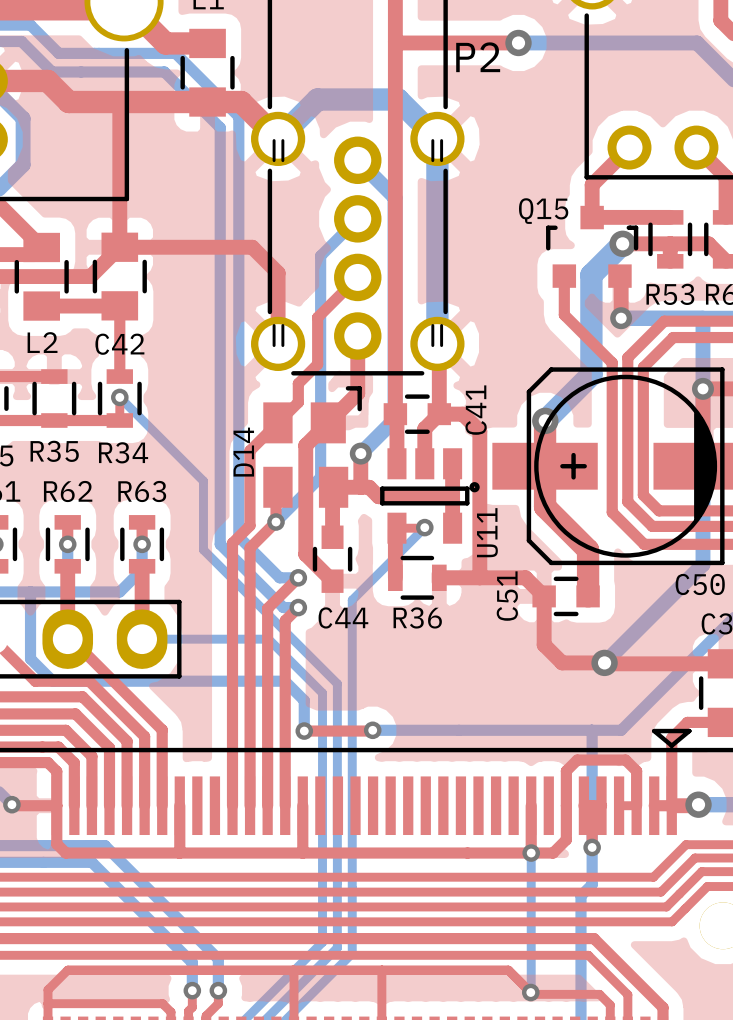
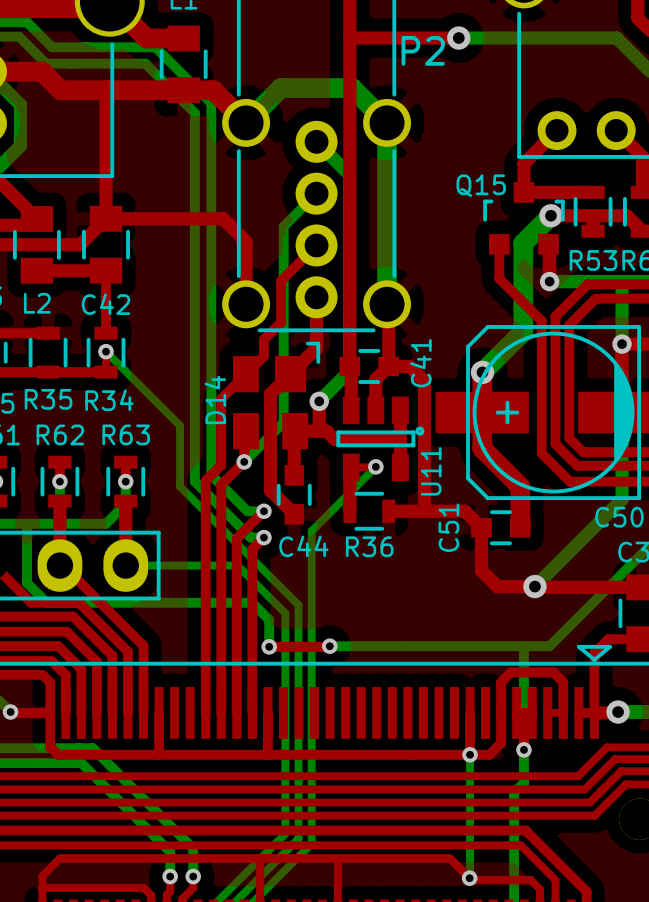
board edge: (274, 140) (274, 160) -> none
board edge: (282, 140) (282, 160) -> none
board edge: (432, 140) (432, 160) -> none
board edge: (441, 140) (441, 160) -> none
board edge: (274, 325) (274, 345) -> none
board edge: (282, 325) (282, 345) -> none
board edge: (432, 325) (432, 345) -> none
board edge: (441, 325) (441, 345) -> none

